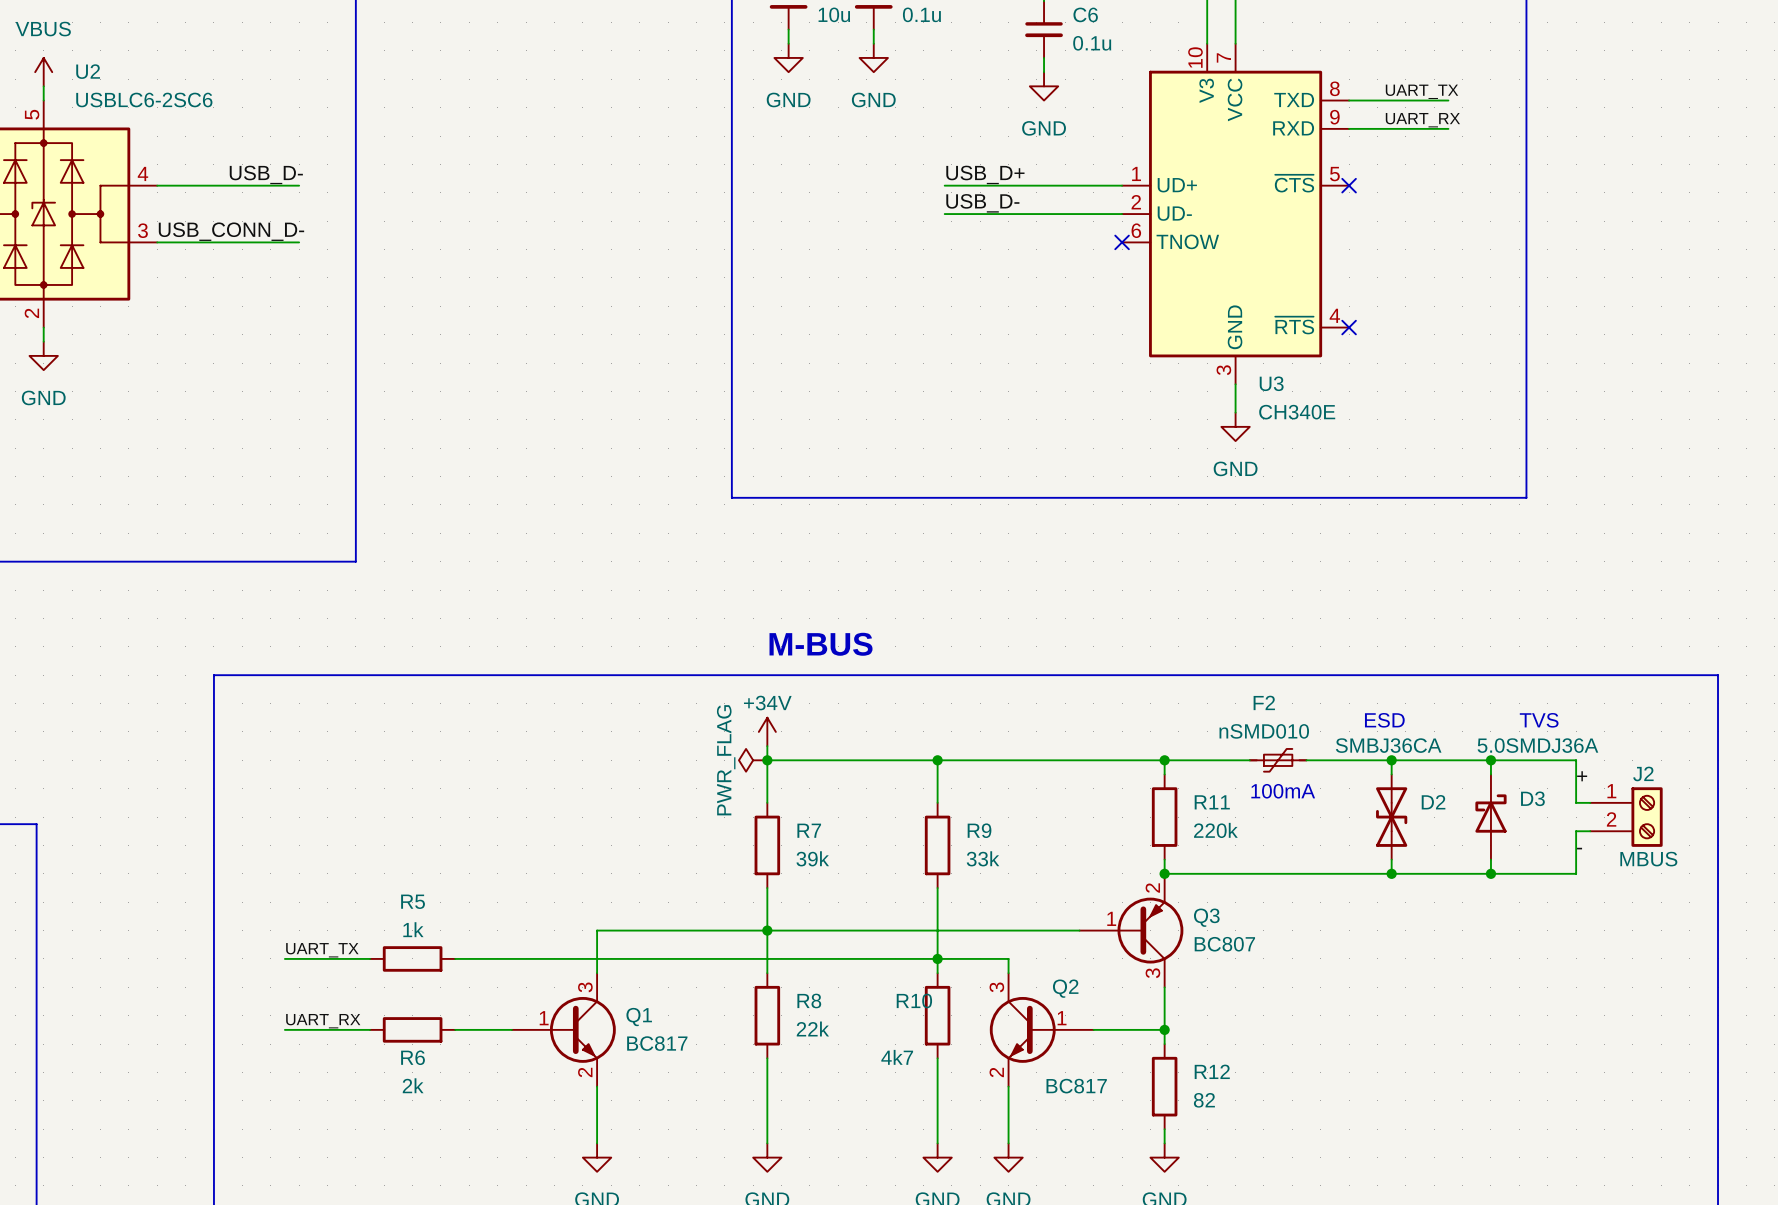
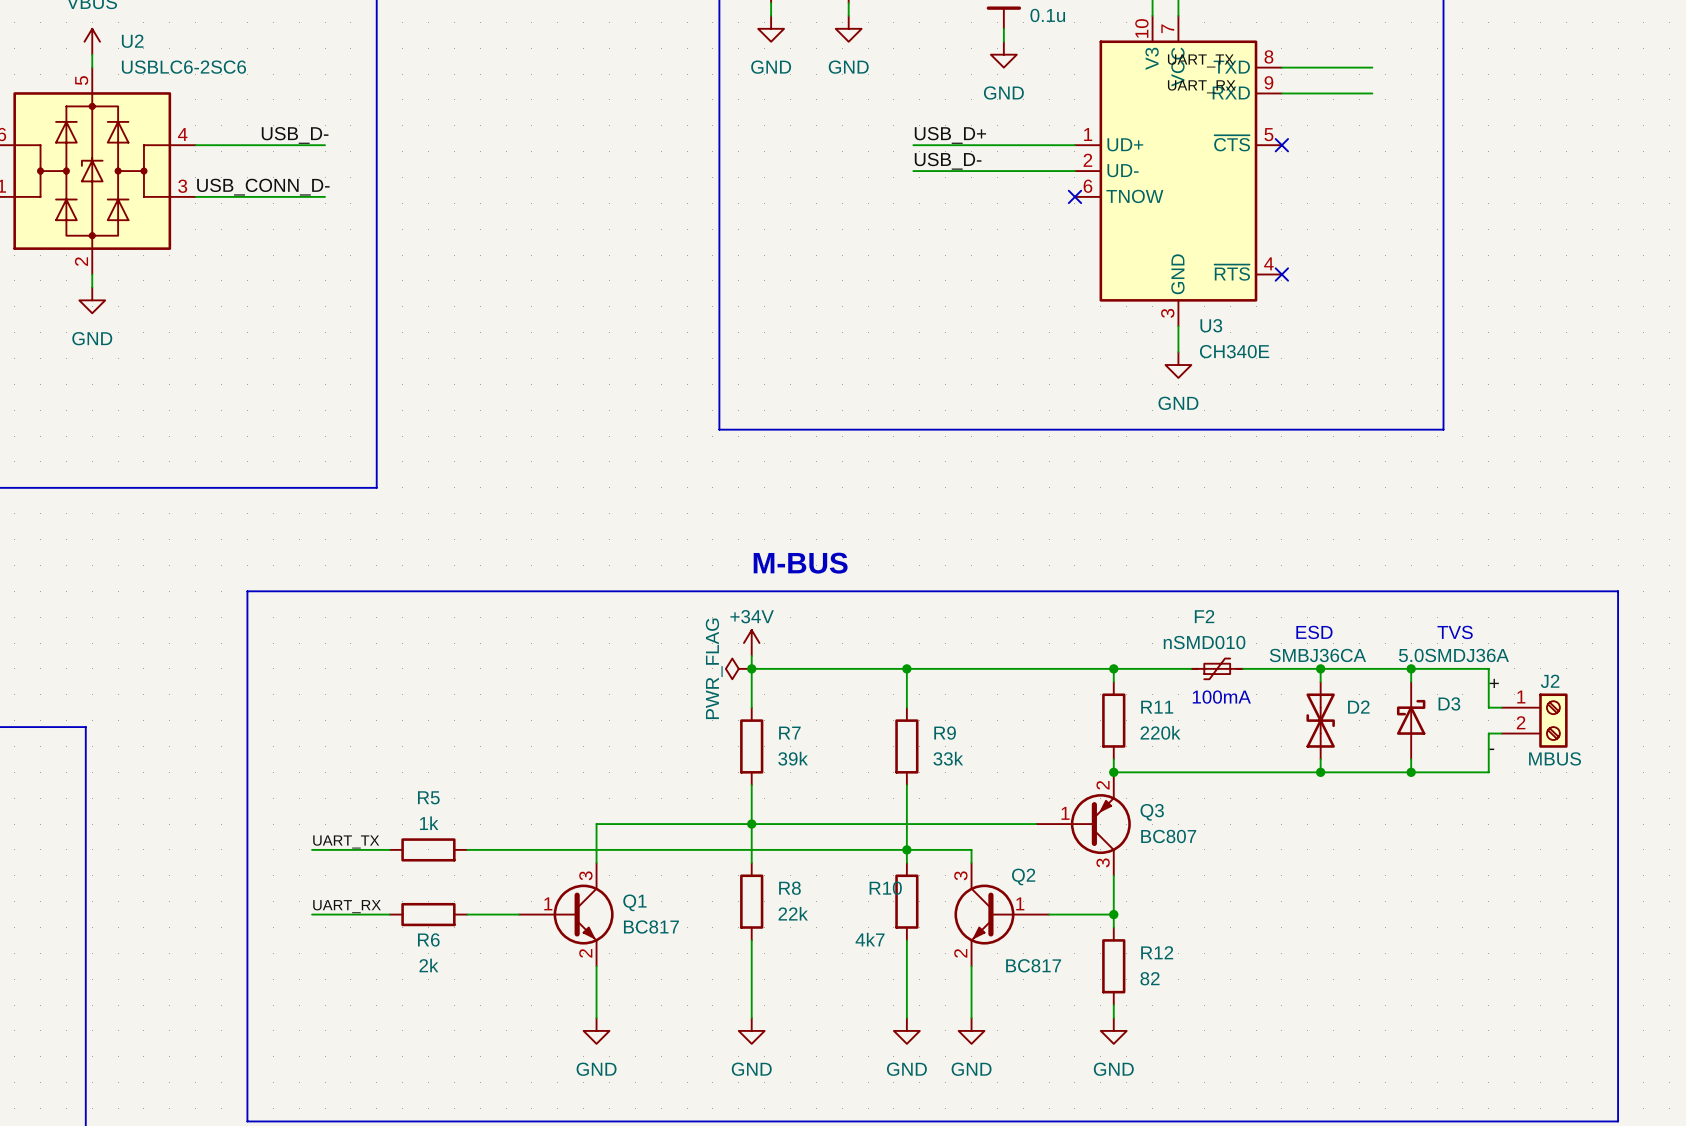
label position: UART_TX (1422, 91) -> UART_TX (1200, 60)
label position: UART_RX (1422, 120) -> UART_RX (1201, 86)

